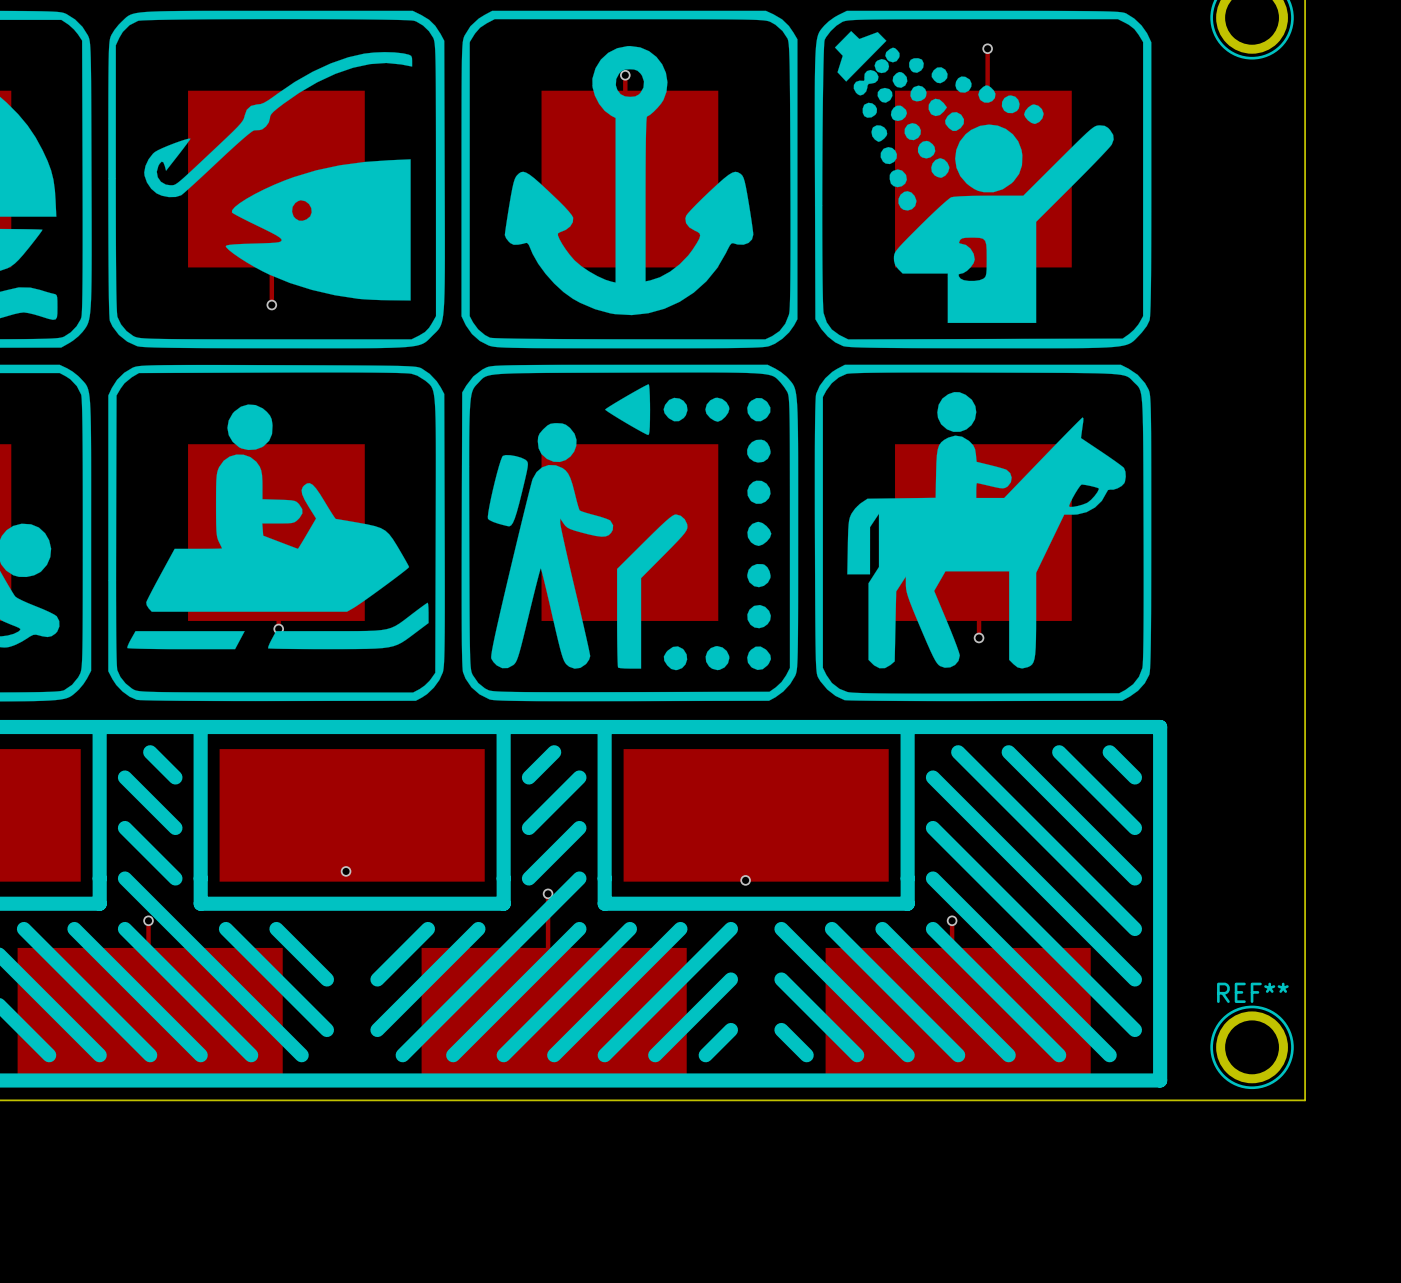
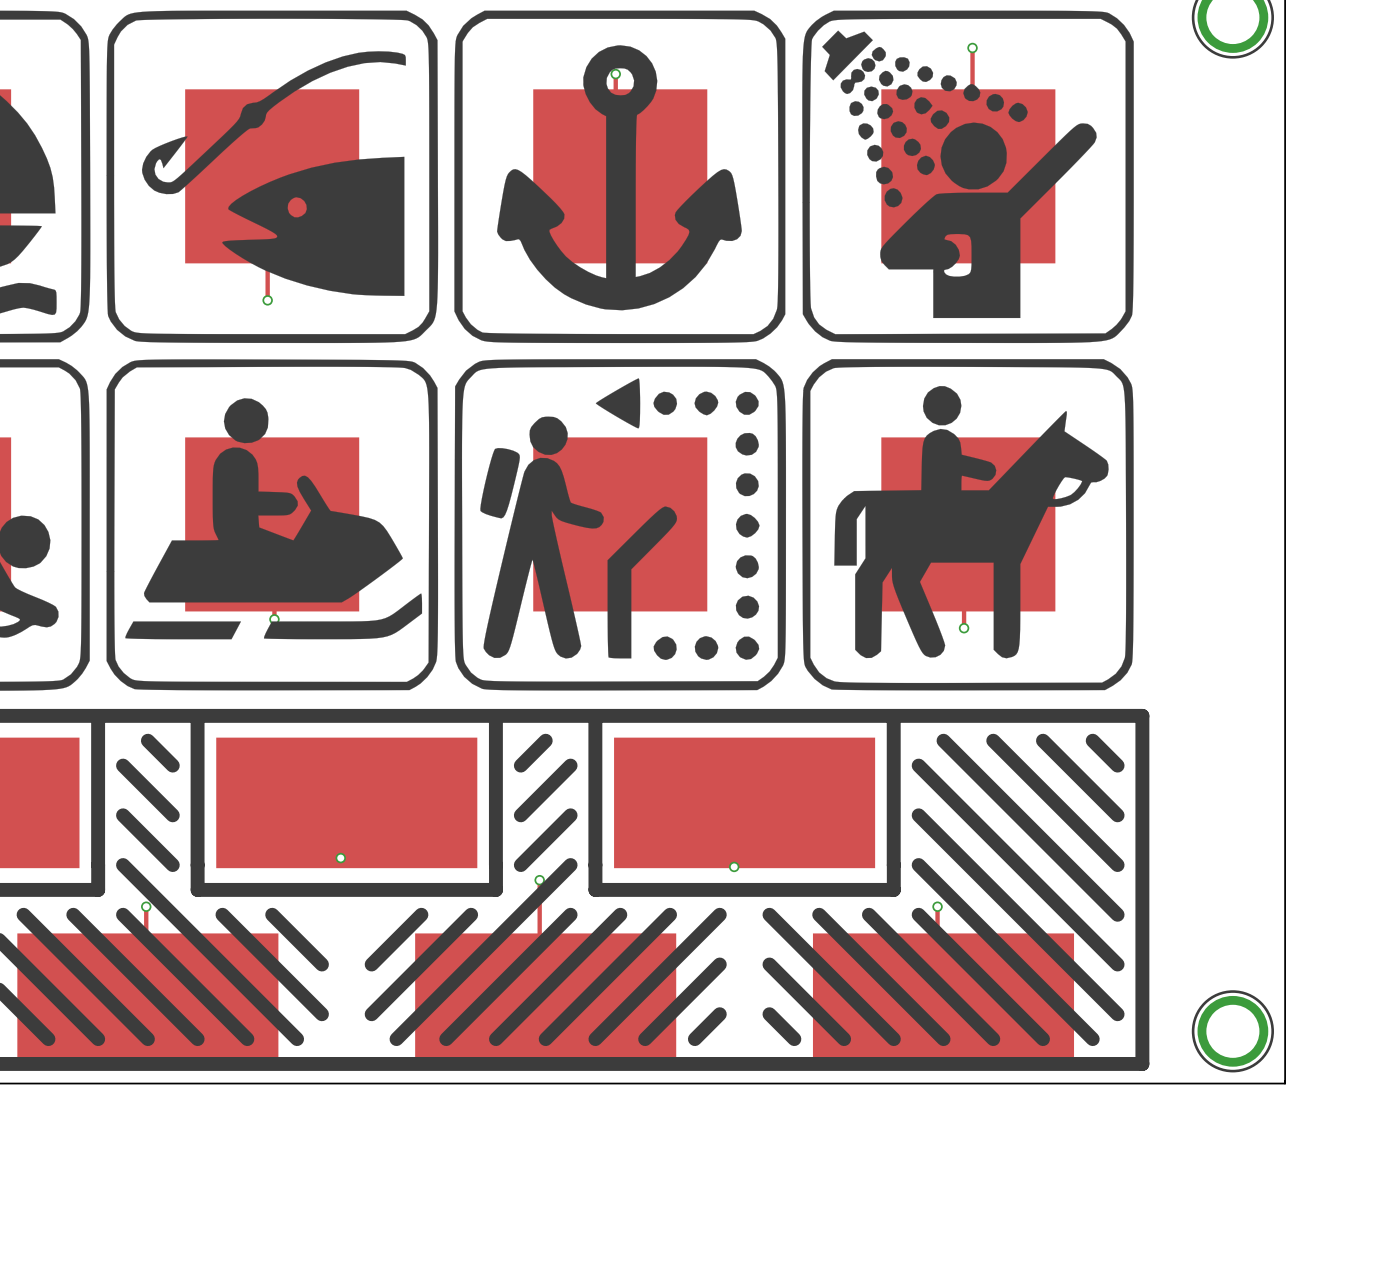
REF** name: REF** (1252, 992) -> none

